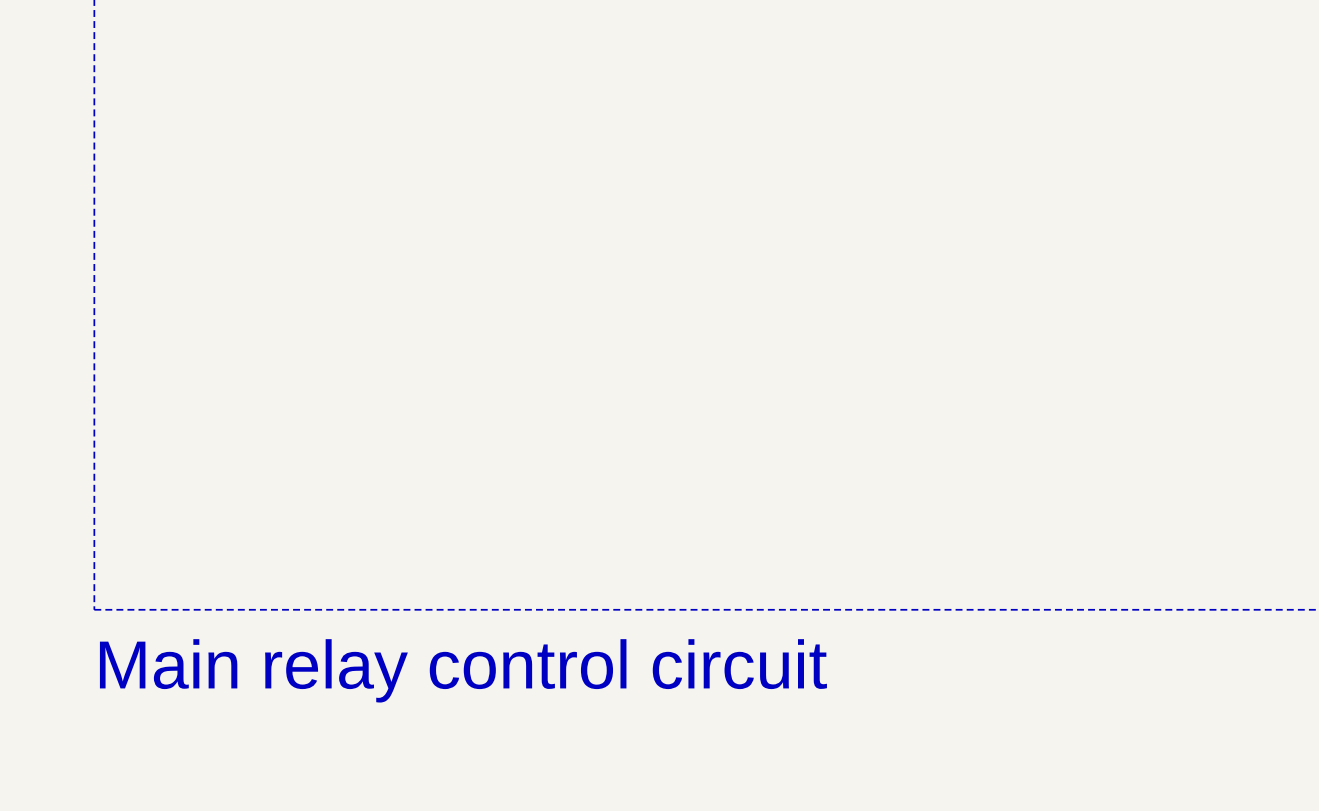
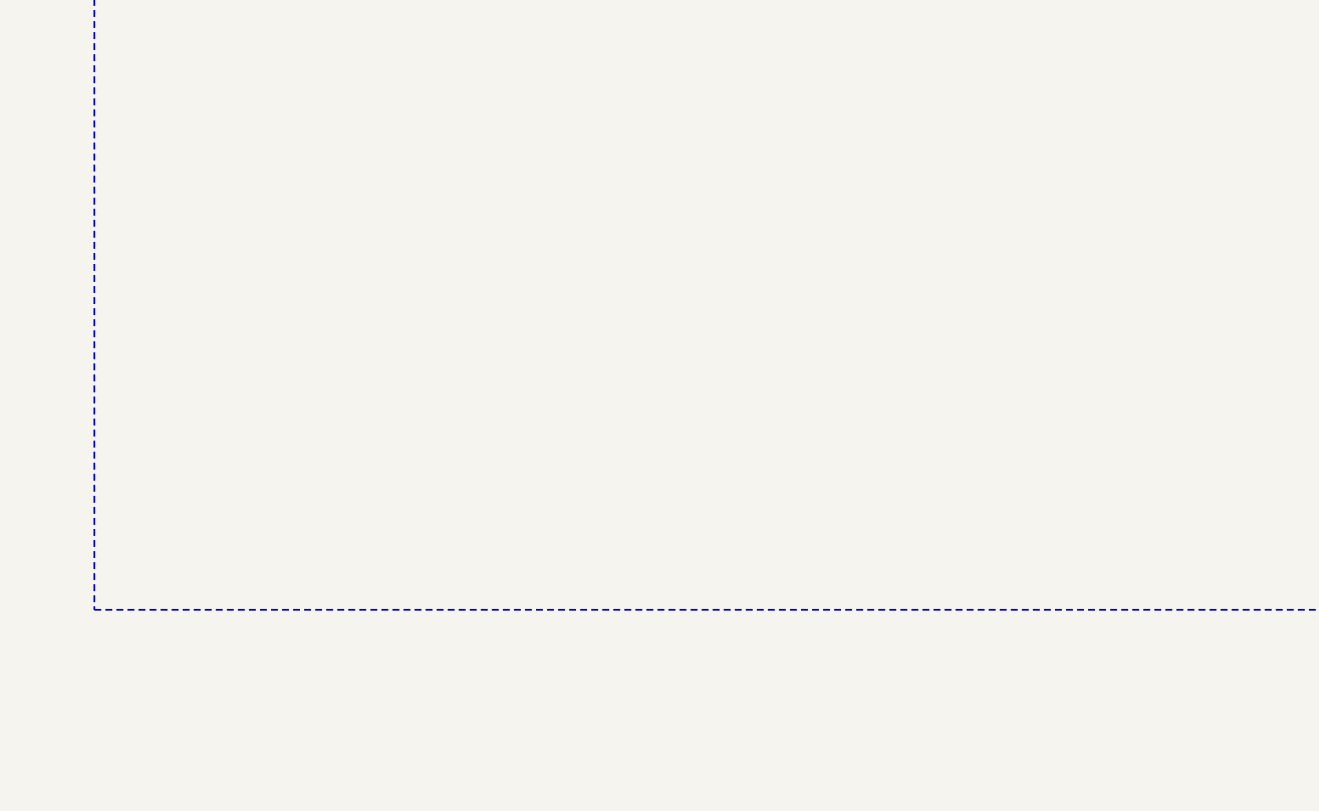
text: Main relay control circuit (463, 670) -> none

